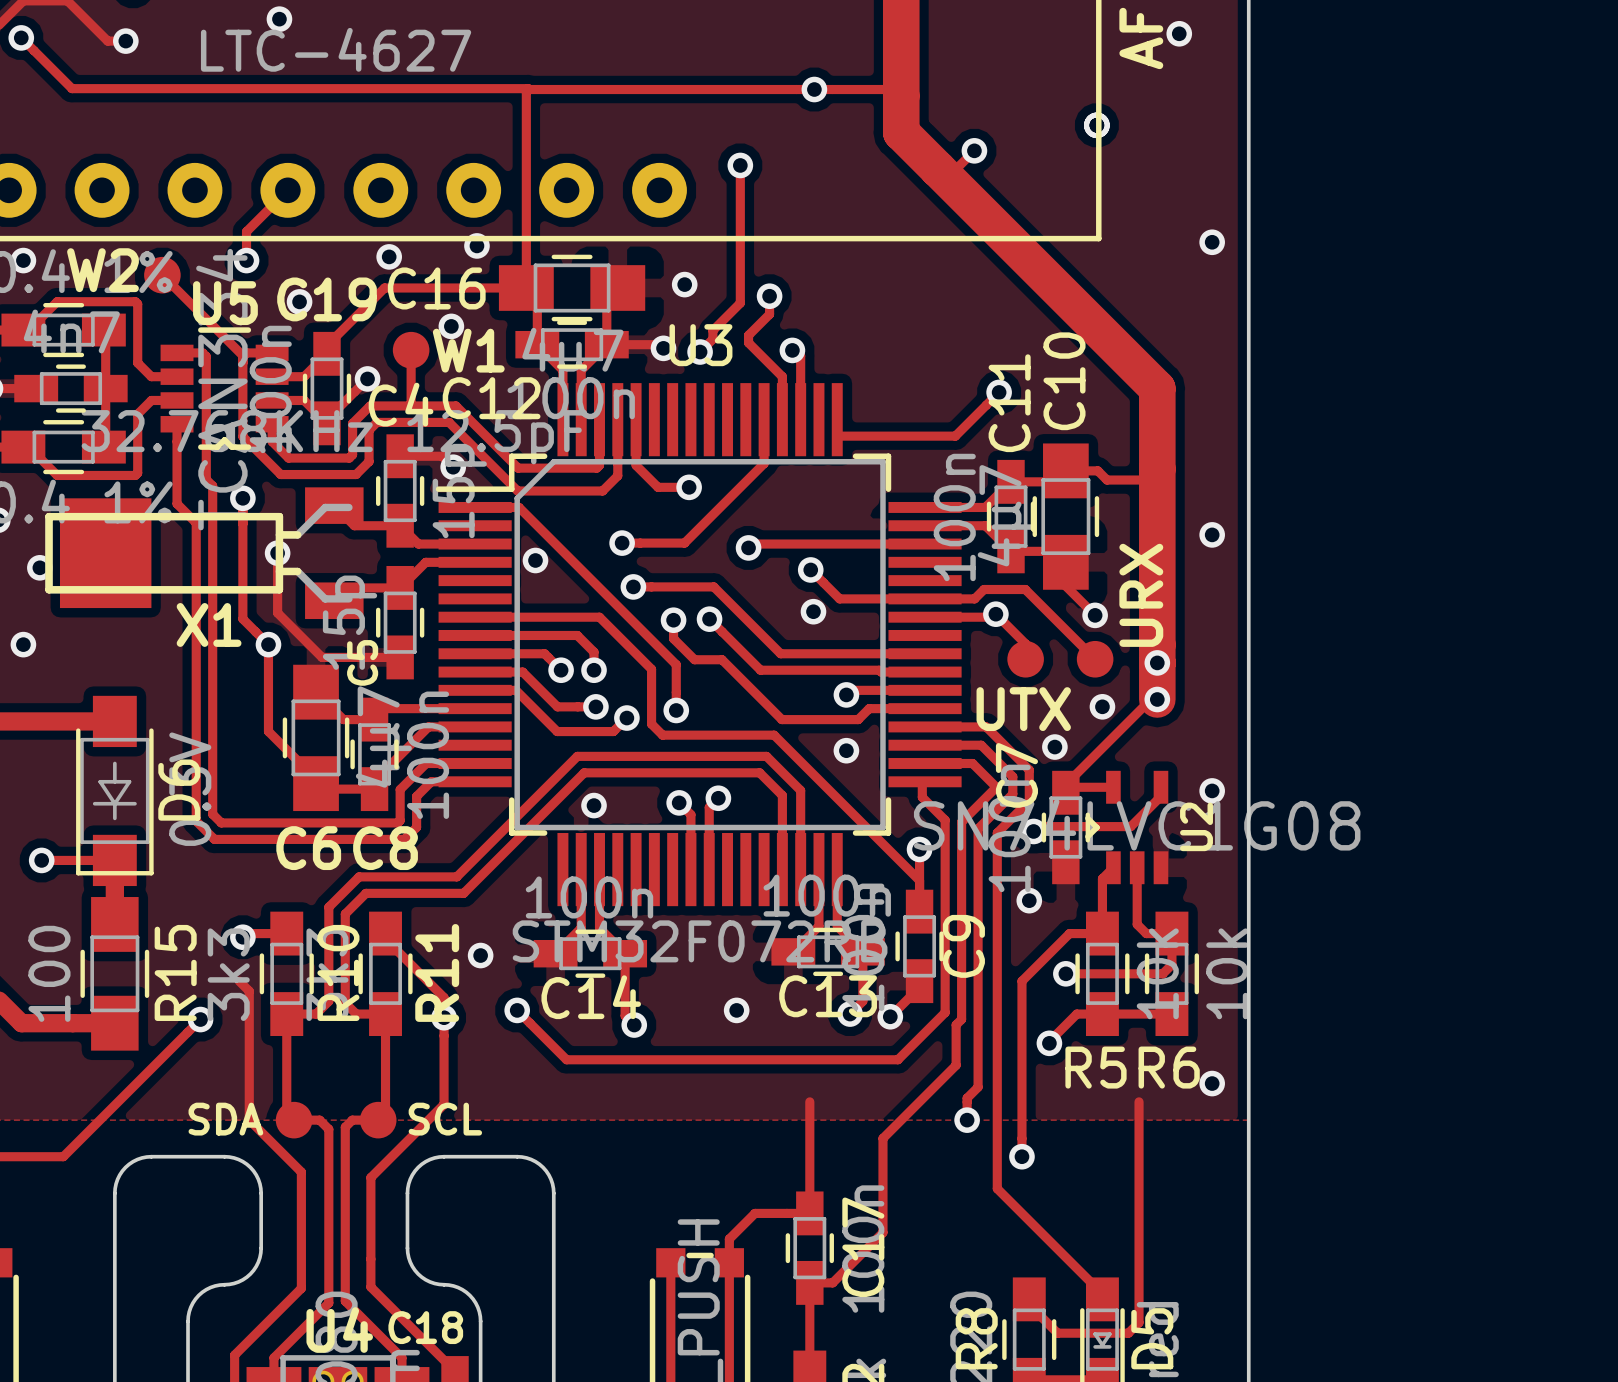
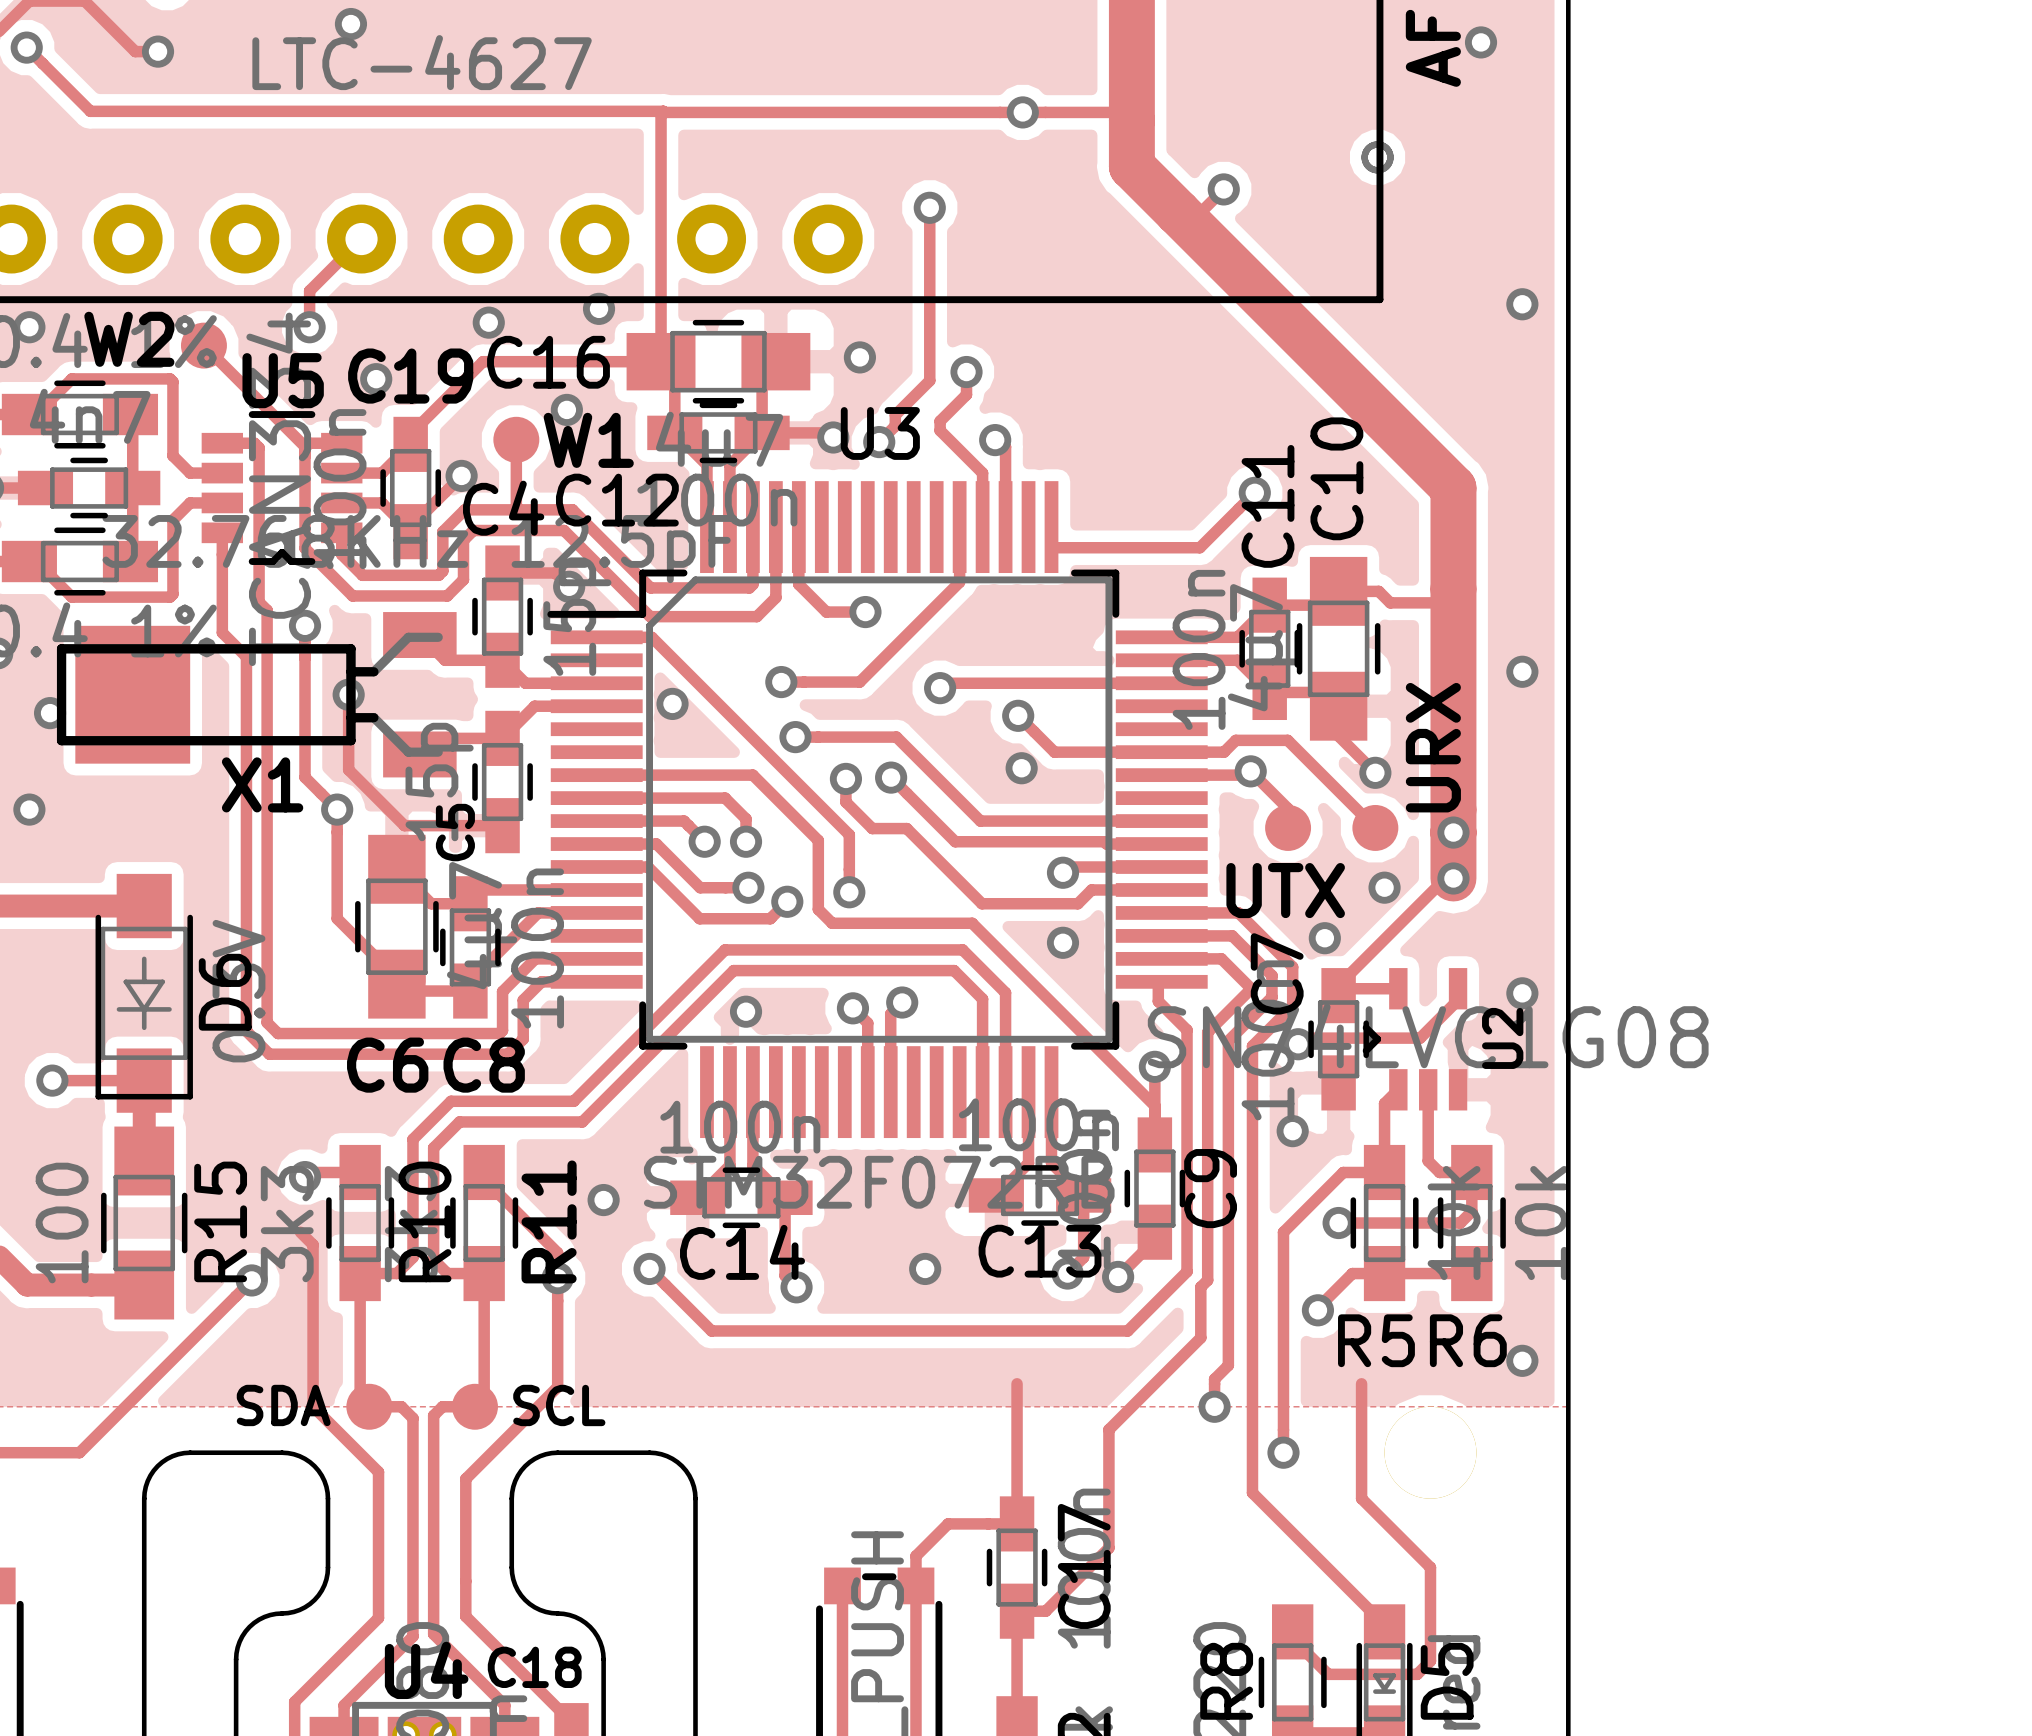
track: (1139, 1101) (1139, 1248) -> (1361, 1383) (1361, 1498) (1430, 1567)

